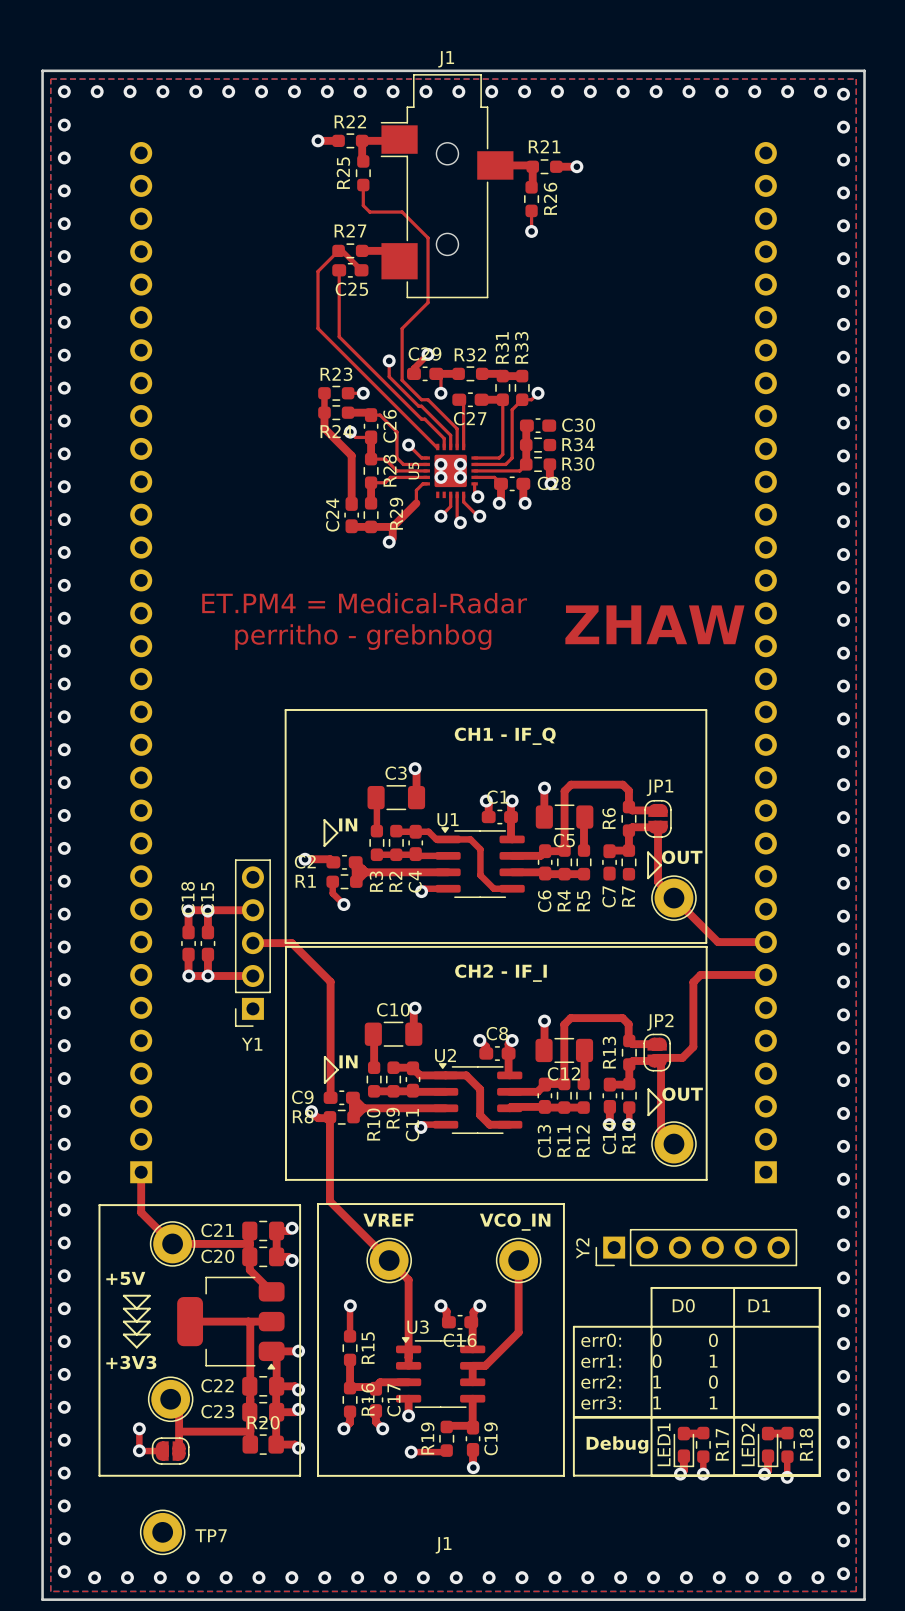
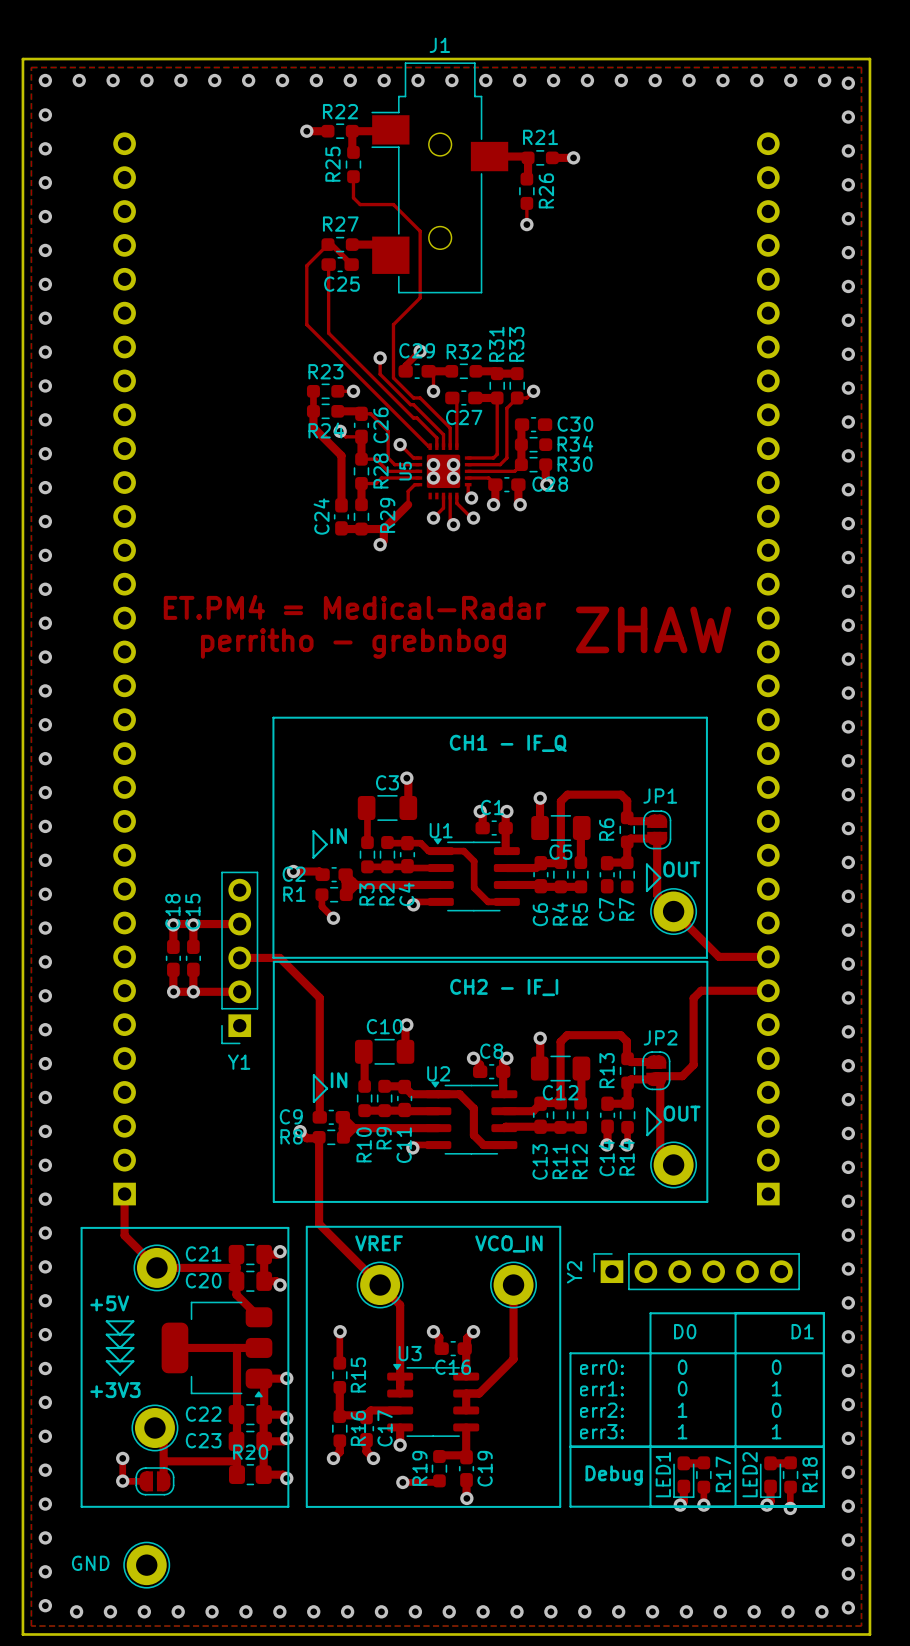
Y2 footprint: [595, 1228, 798, 1267] -> [593, 1253, 800, 1291]
TP7 name: TP7 (211, 1535) -> GND (90, 1563)
text: J1 (443, 1545) -> none

